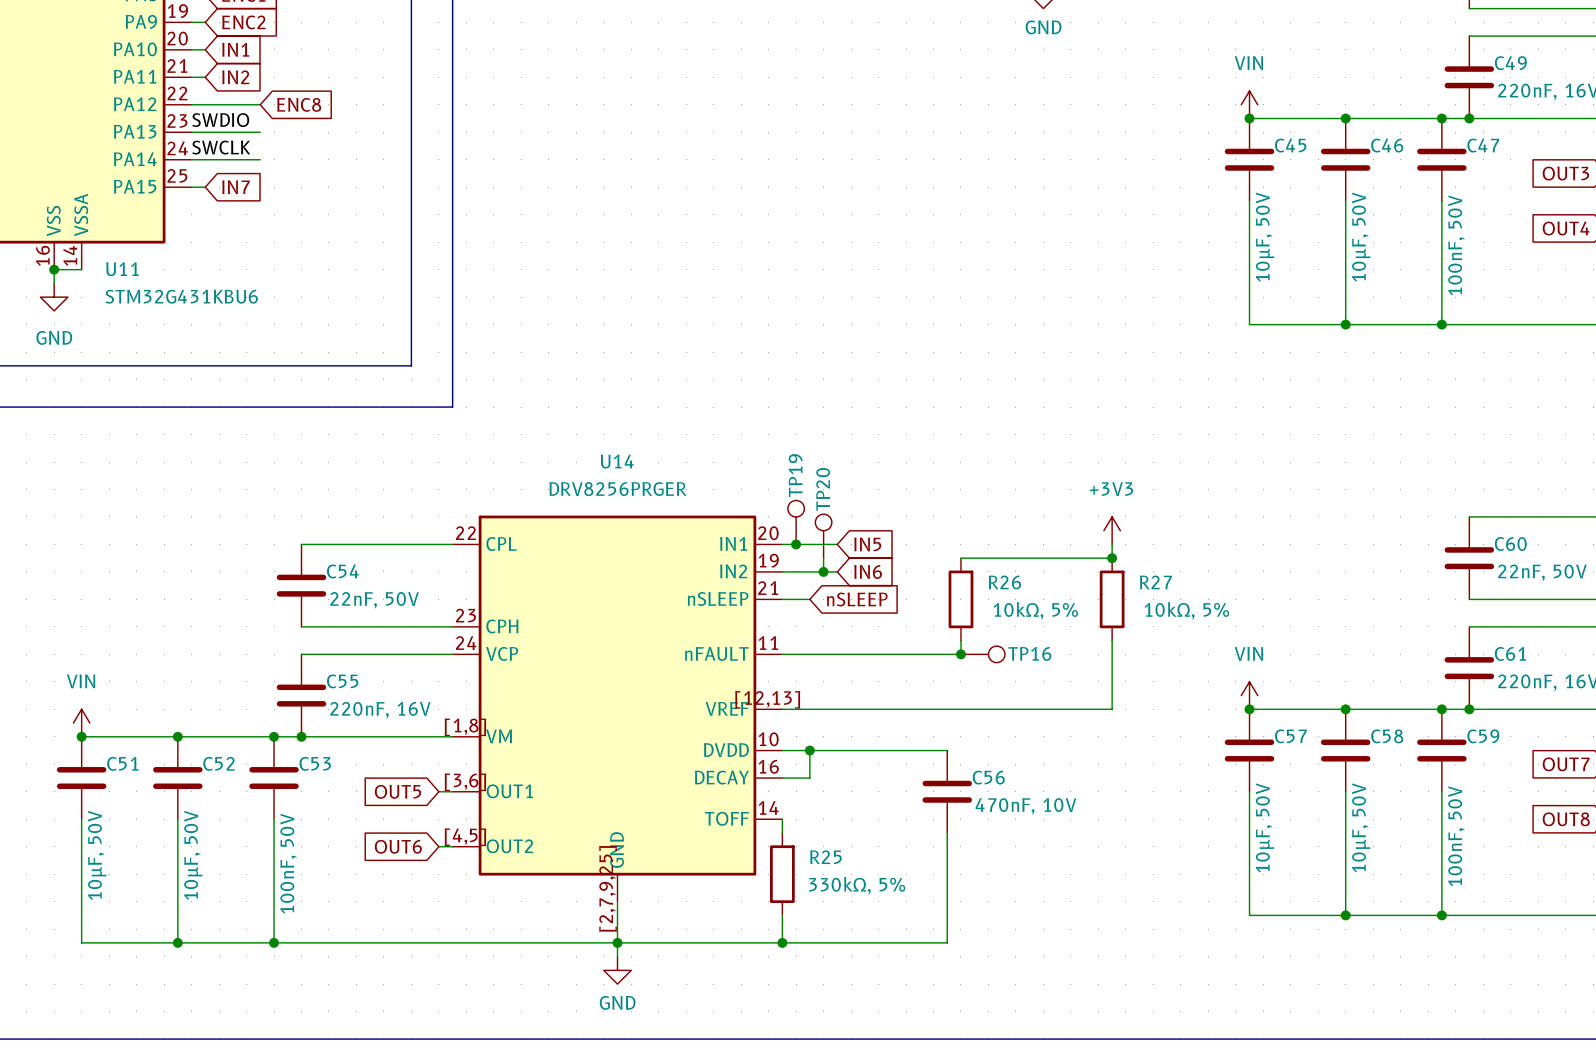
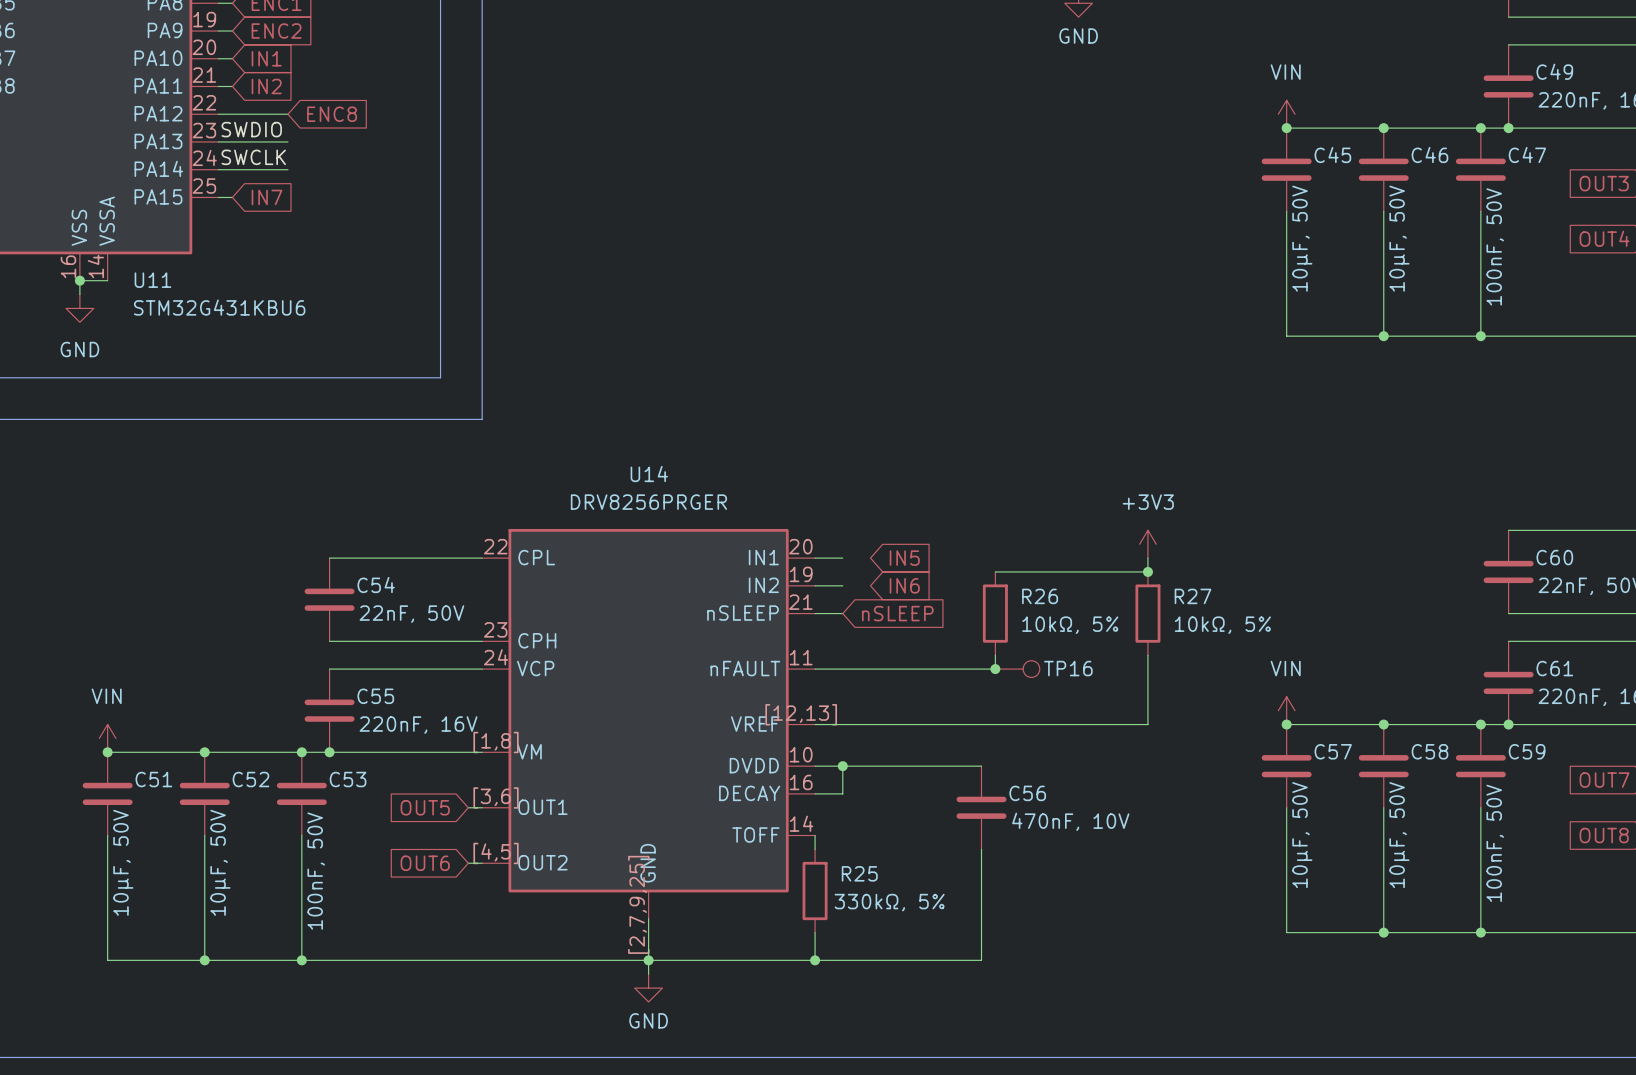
TP19: (796, 522) -> none
TP20: (823, 536) -> none
junction: (796, 544) -> none
wire: (809, 544) (837, 544) -> none
wire: (823, 558) (823, 571) -> none
wire: (809, 571) (837, 571) -> none
junction: (823, 571) -> none

